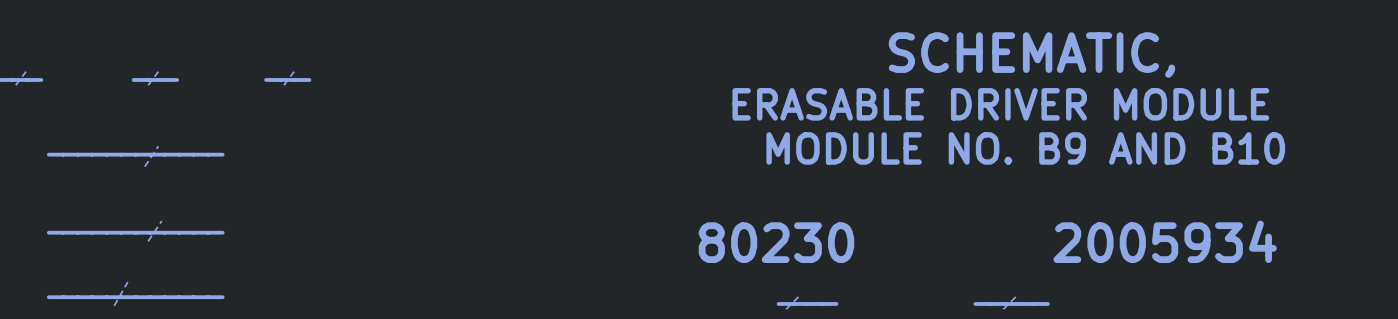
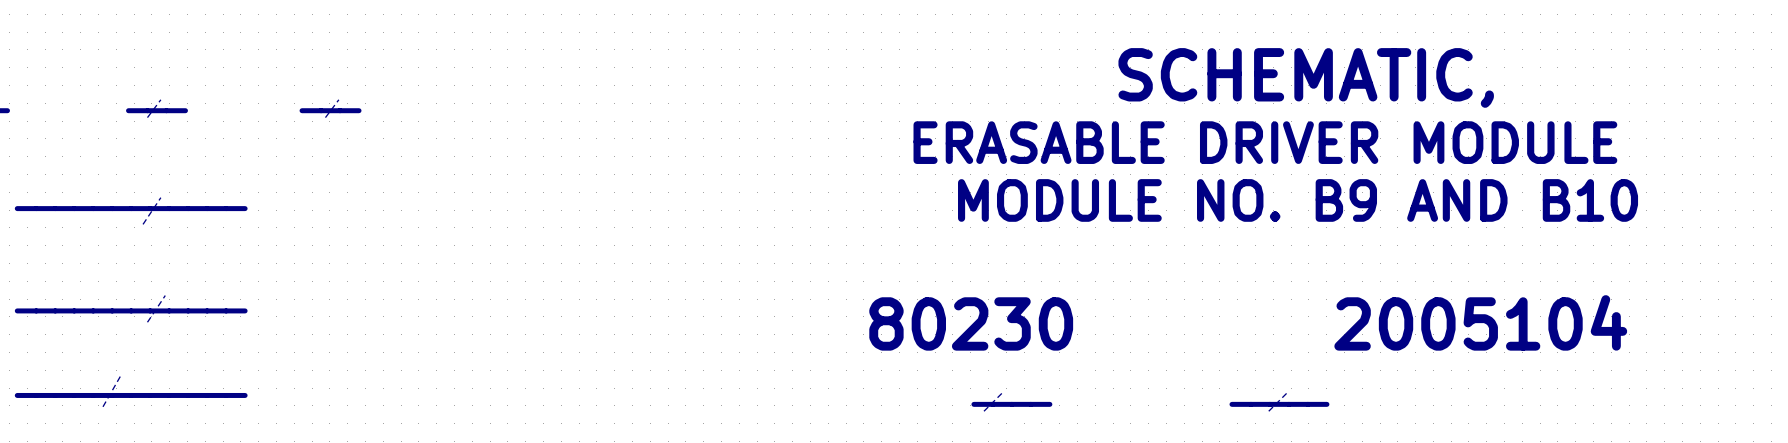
text: 2005934 (1165, 241) -> 2005104 (1480, 322)

